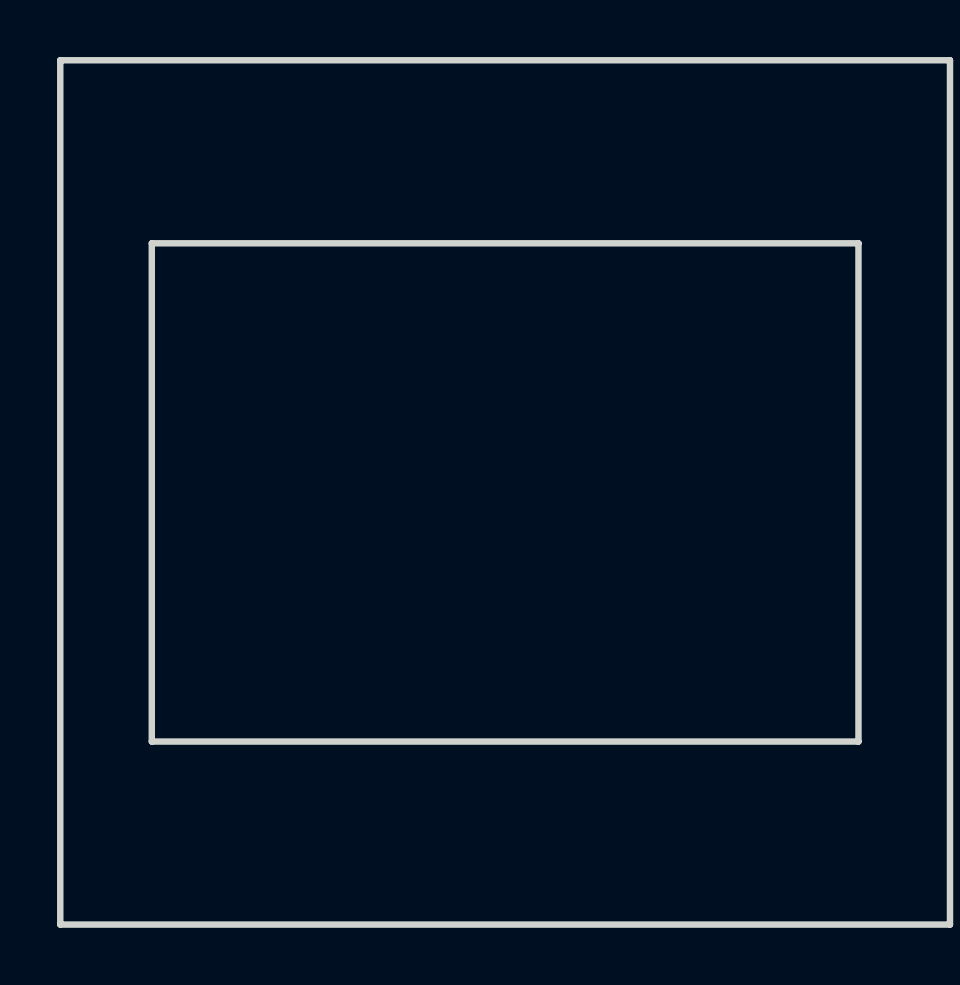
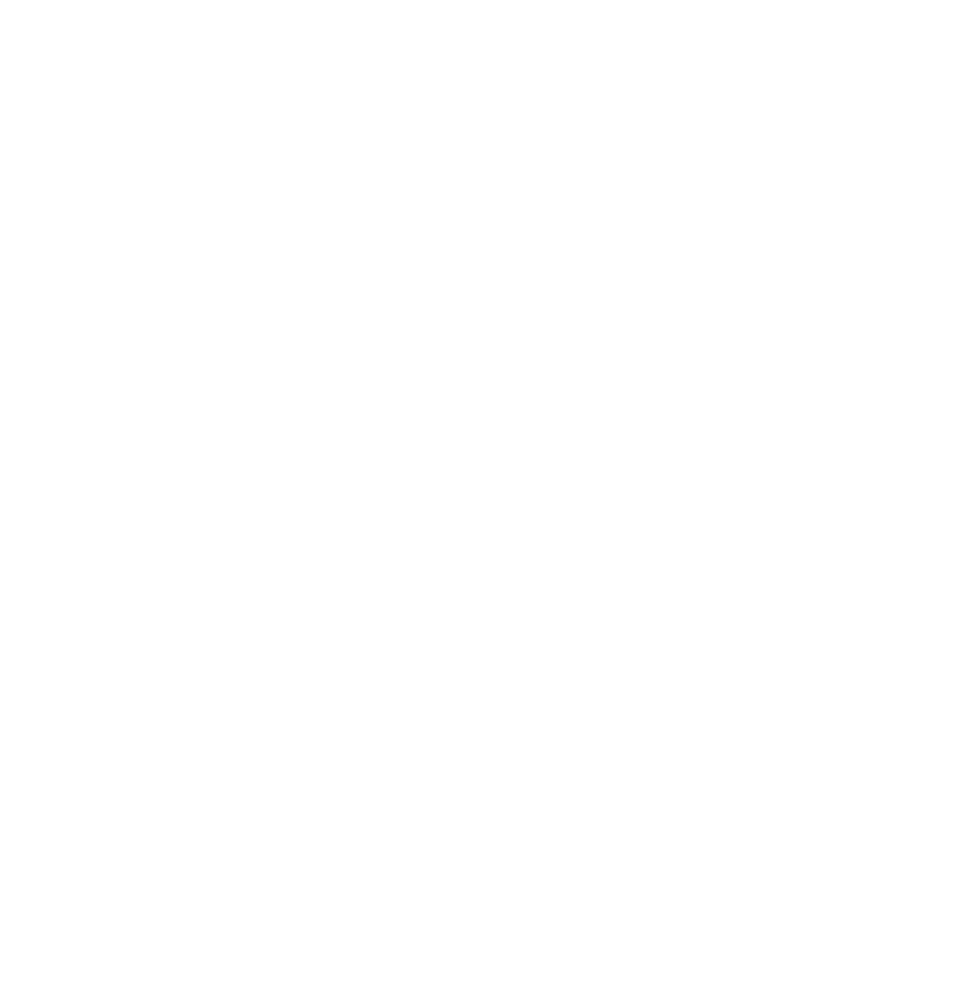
board edge: (949, 60) (60, 60) (60, 924) (949, 924) (949, 60) -> none
board edge: (858, 243) (858, 741) (151, 741) (151, 243) (858, 243) -> none

